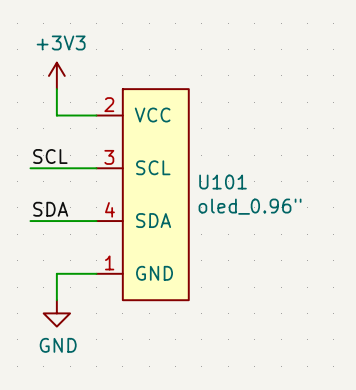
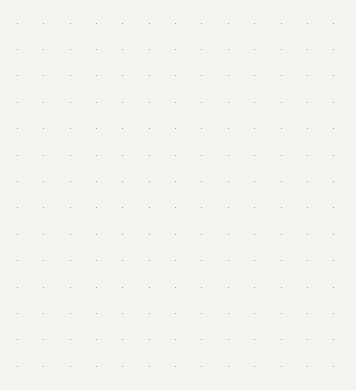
power symbol: +3V3 (56, 75) -> none
wire: (56, 89) (56, 115) (96, 115) -> none
label: SCL (50, 156) -> none
wire: (30, 168) (96, 168) -> none
U101: oled_0.96" (142, 194) -> none
label: SDA (50, 209) -> none
wire: (30, 221) (96, 221) -> none
wire: (96, 273) (56, 273) (56, 300) -> none
power symbol: GND (56, 313) -> none

